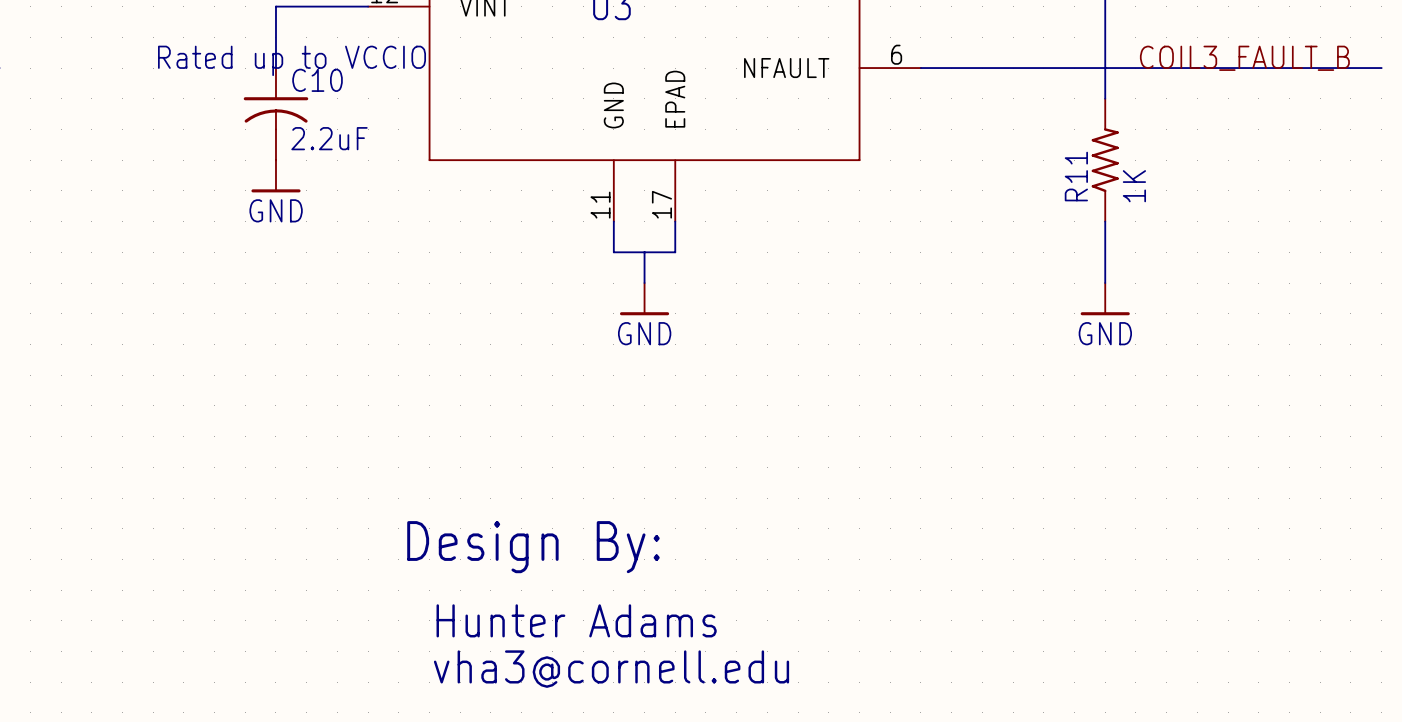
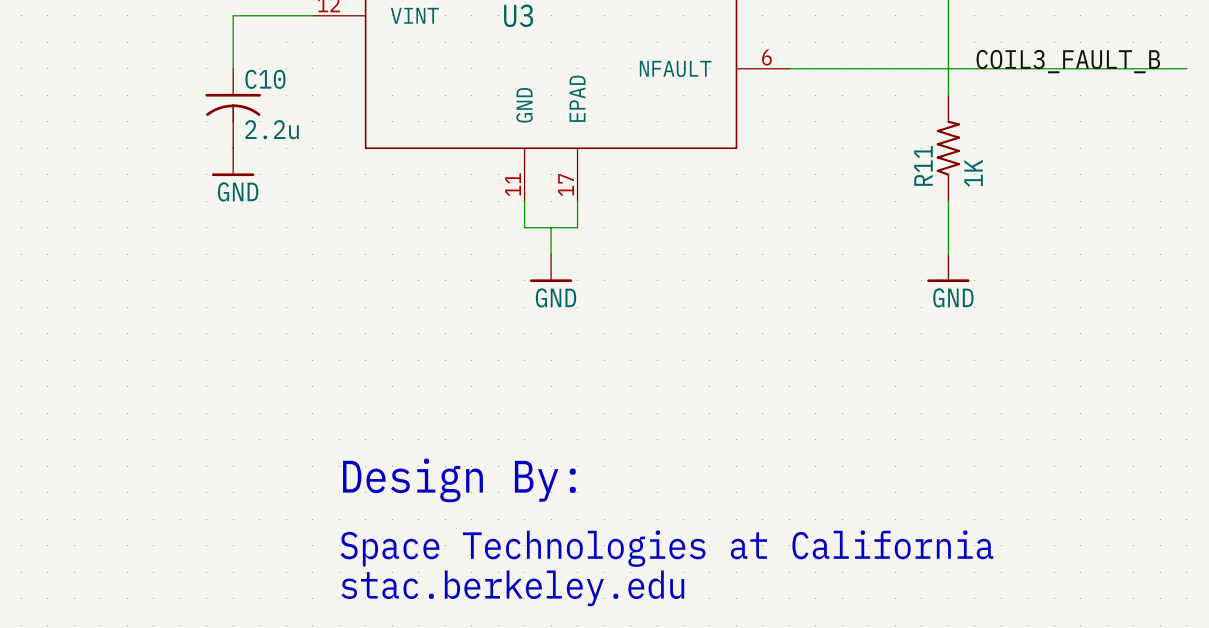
text: Rated up to VCCIO (292, 60) -> none
C10 value: 2.2uF (329, 138) -> 2.2u (272, 129)
text: Hunter Adams (576, 620) -> none
text: none -> Space Technologies at California (666, 548)
text: vha3@cornell.edu (611, 669) -> none
text: none -> stac.berkeley.edu (512, 588)

